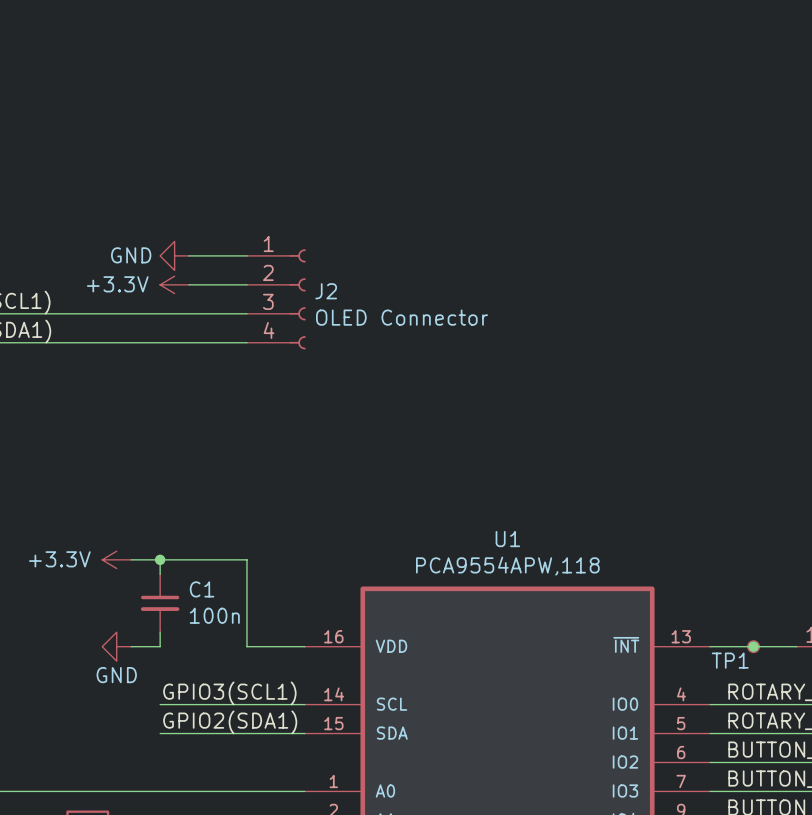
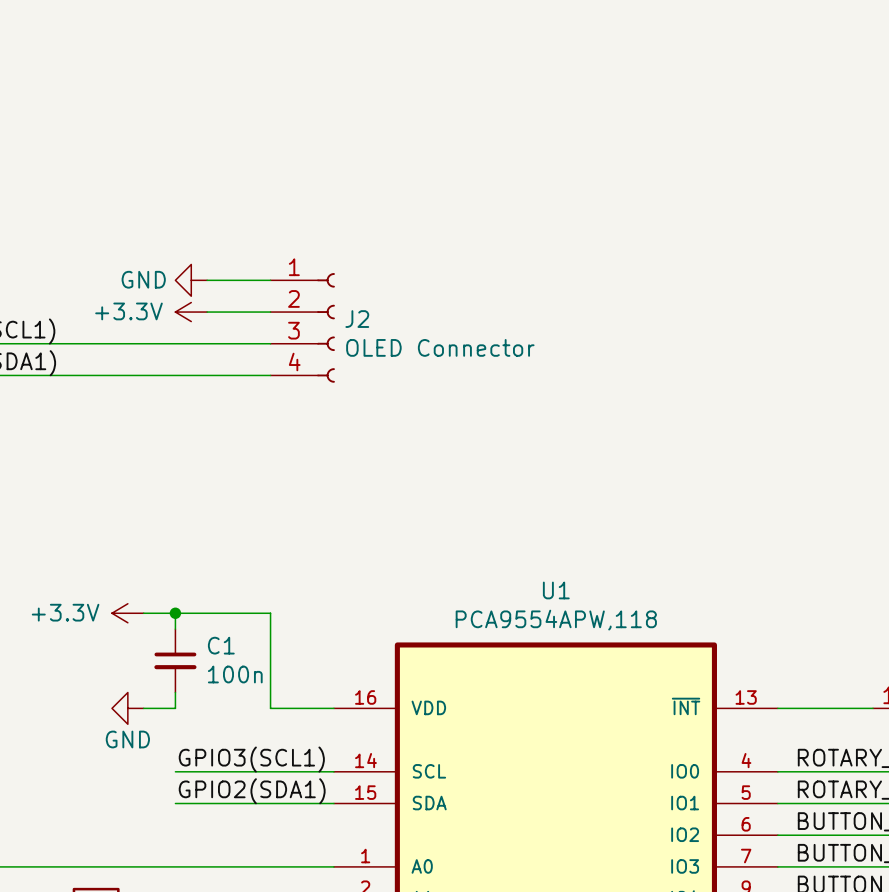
TP1: (753, 646) -> none
junction: (753, 646) -> none

